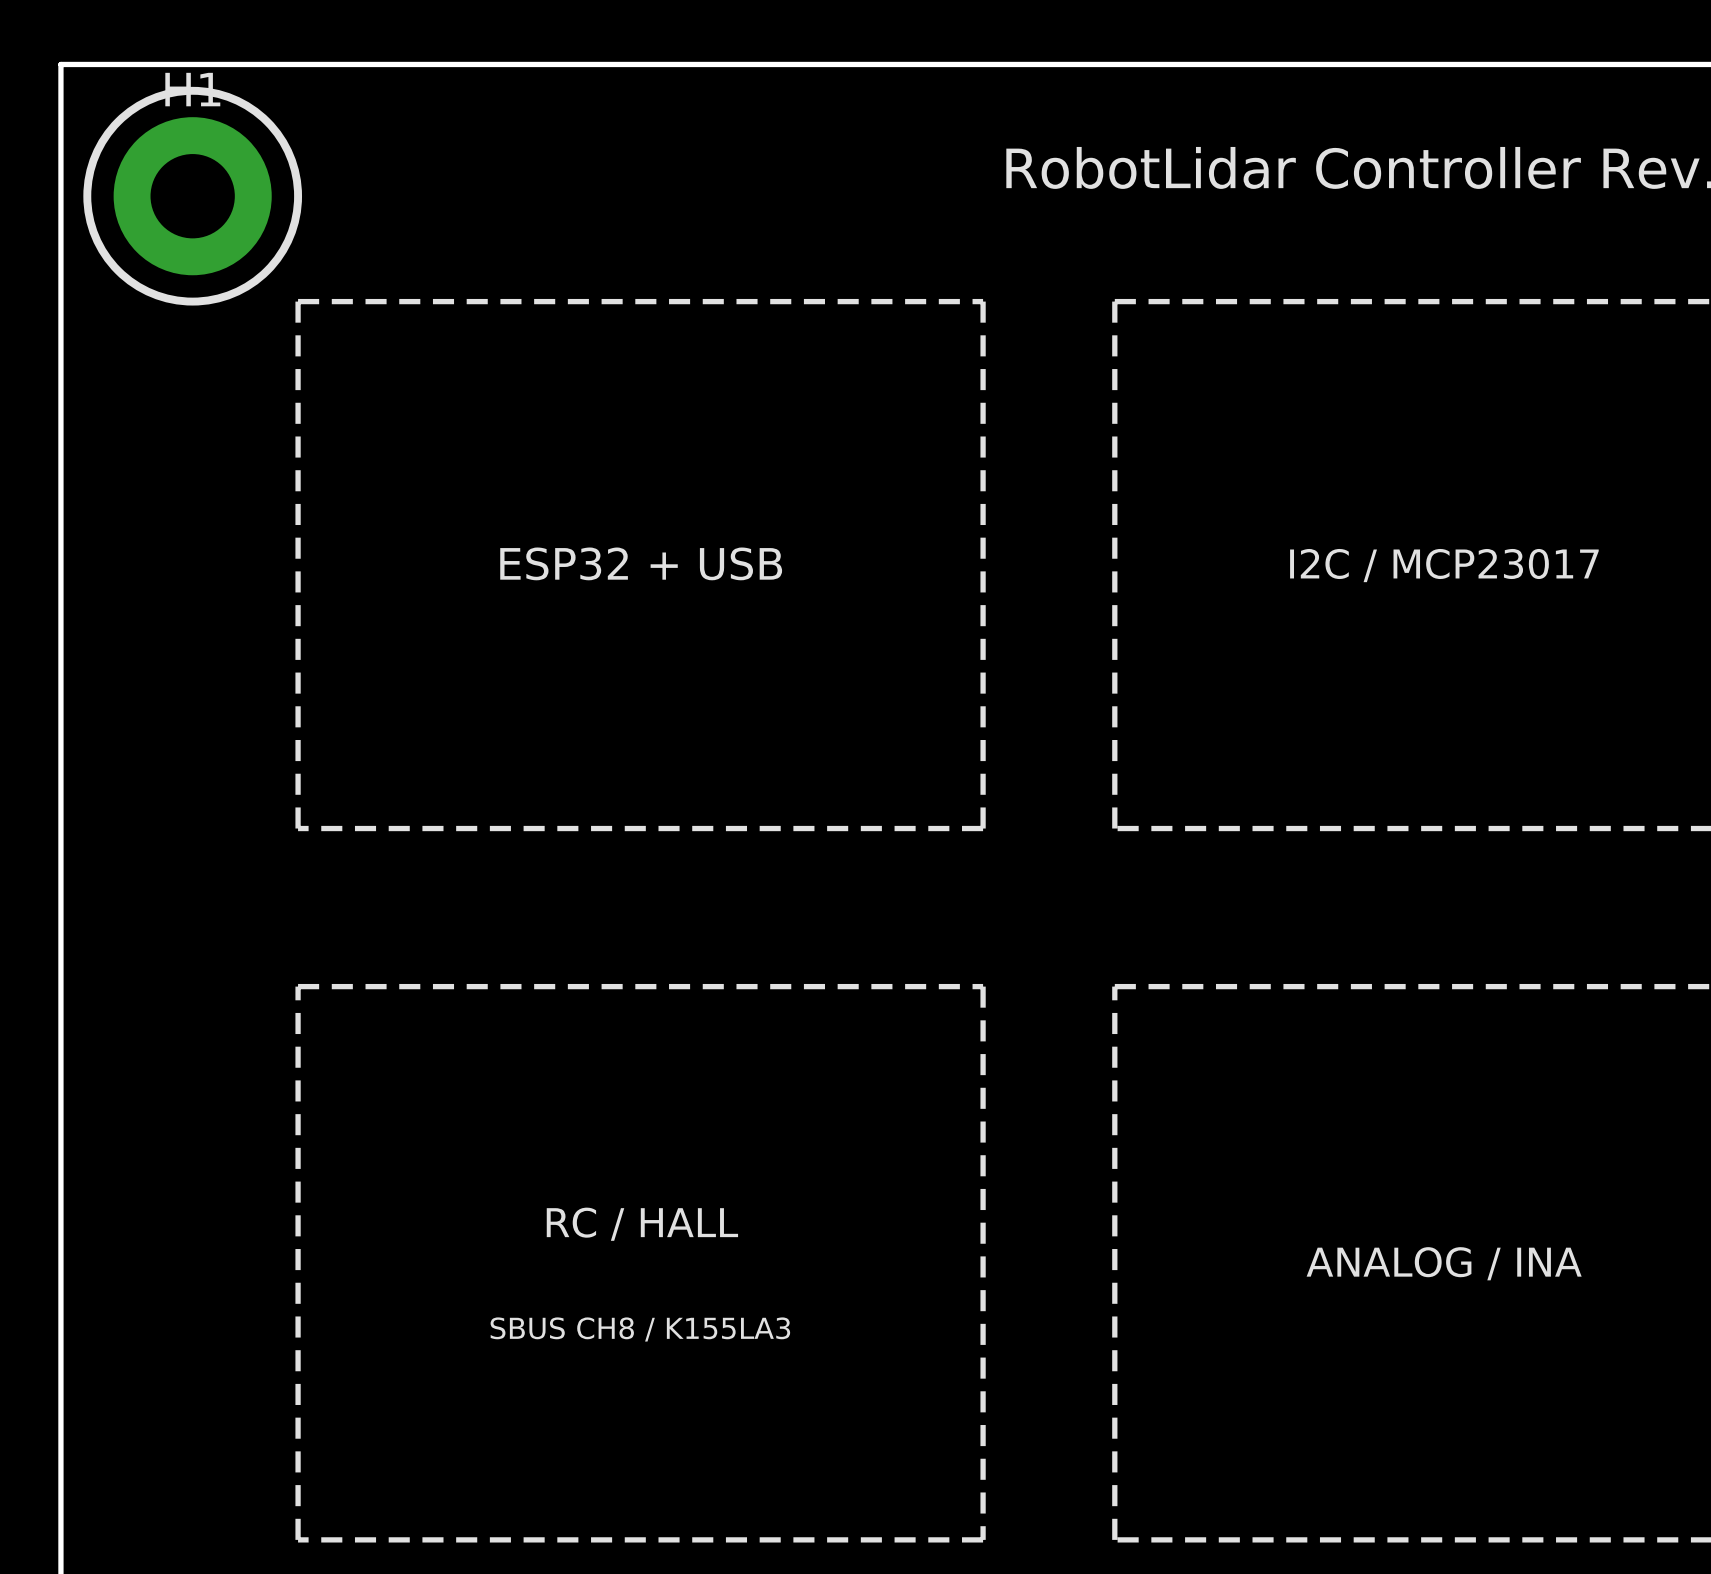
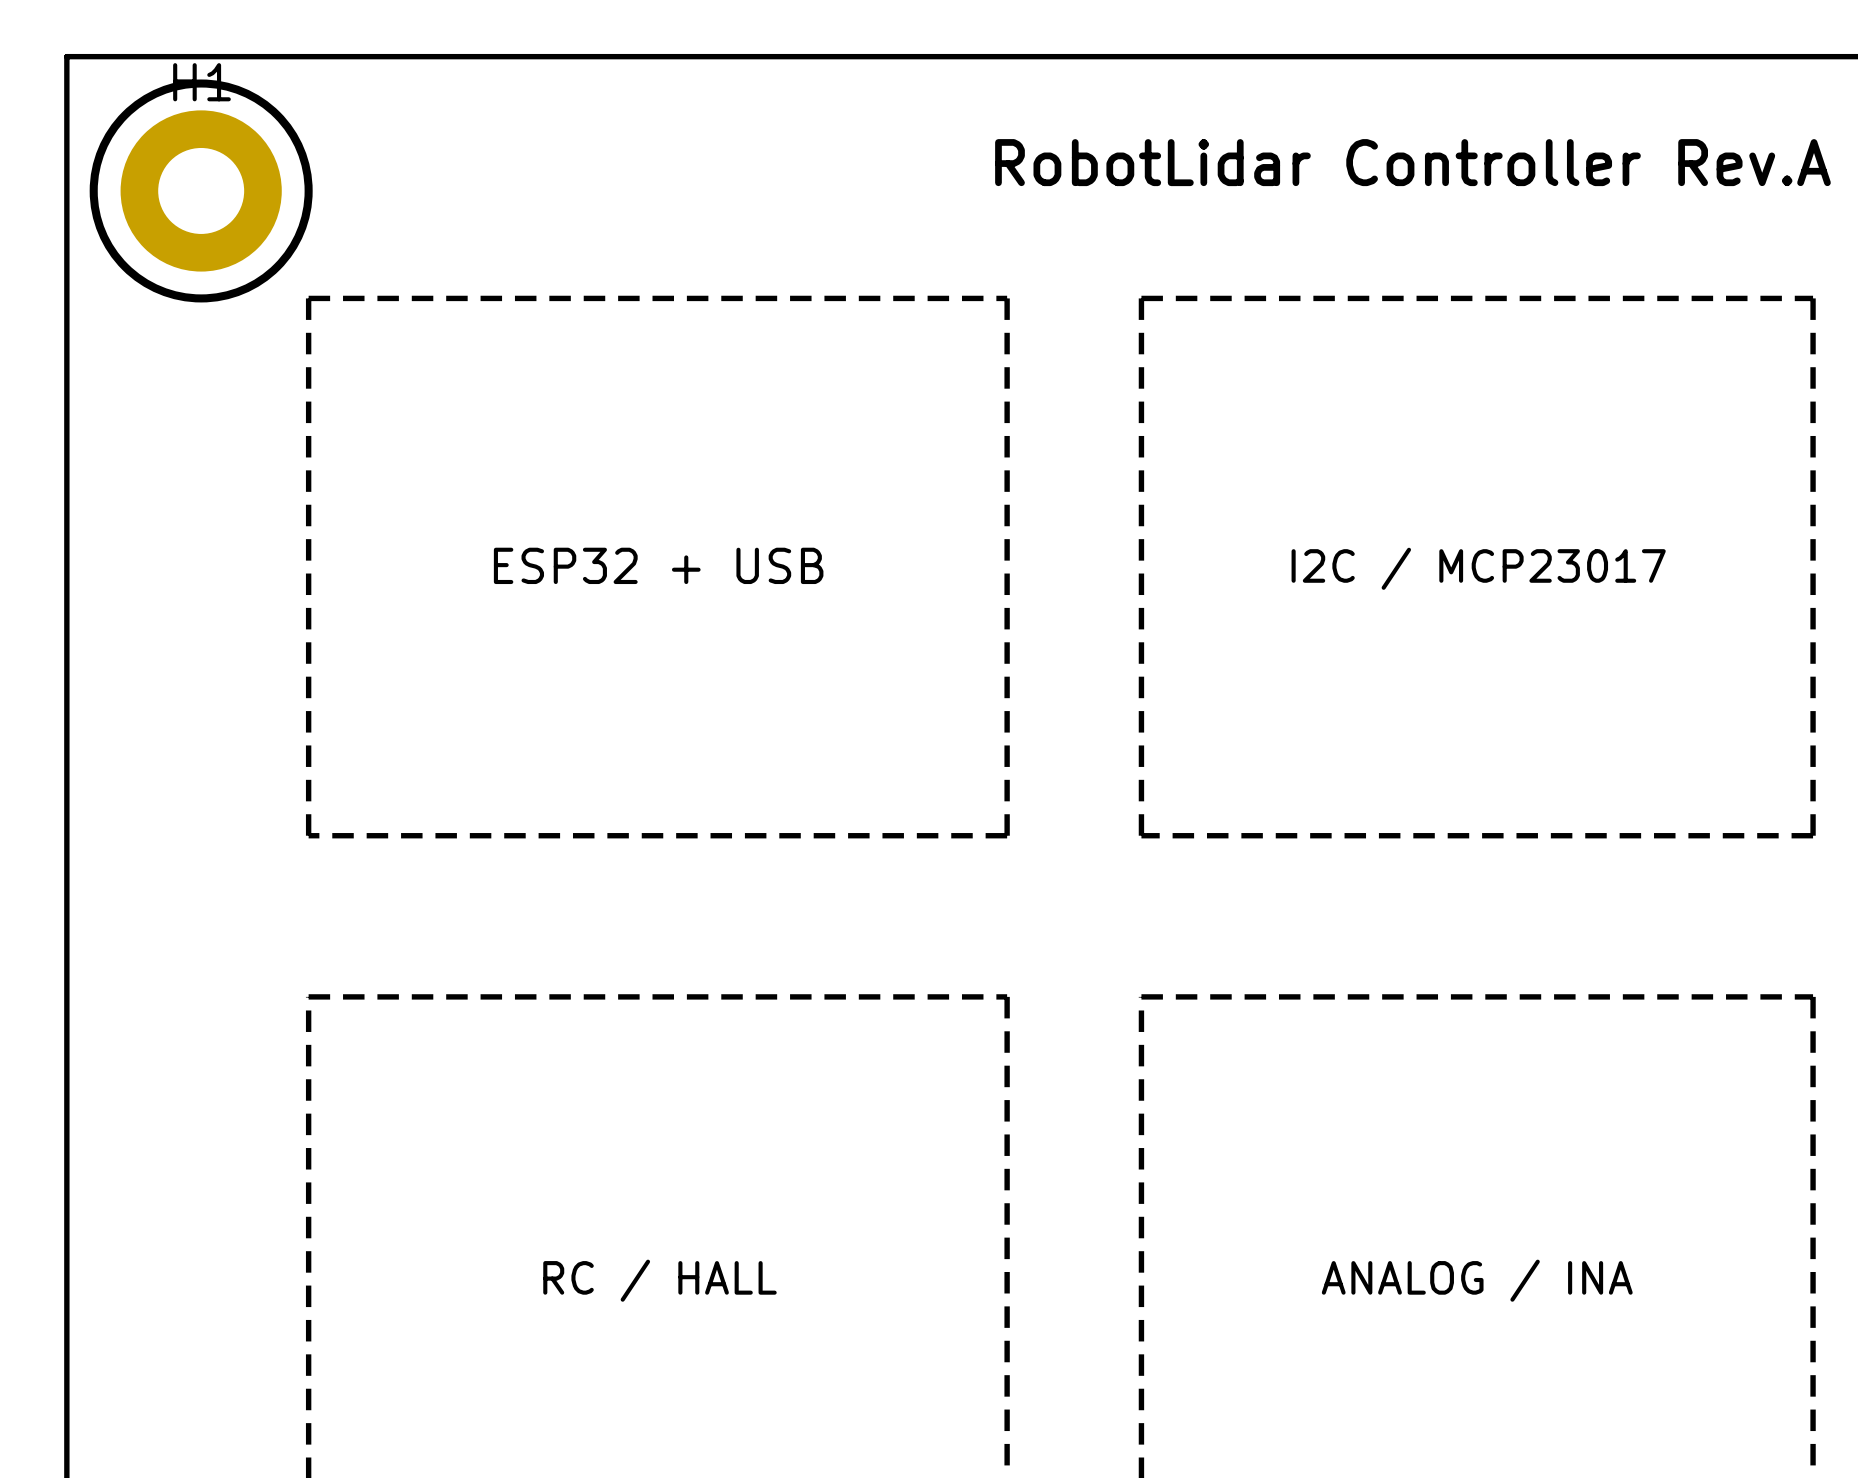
text position: RC / HALL (642, 1224) -> RC / HALL (659, 1280)
text: SBUS CH8 / K155LA3 (640, 1329) -> none

